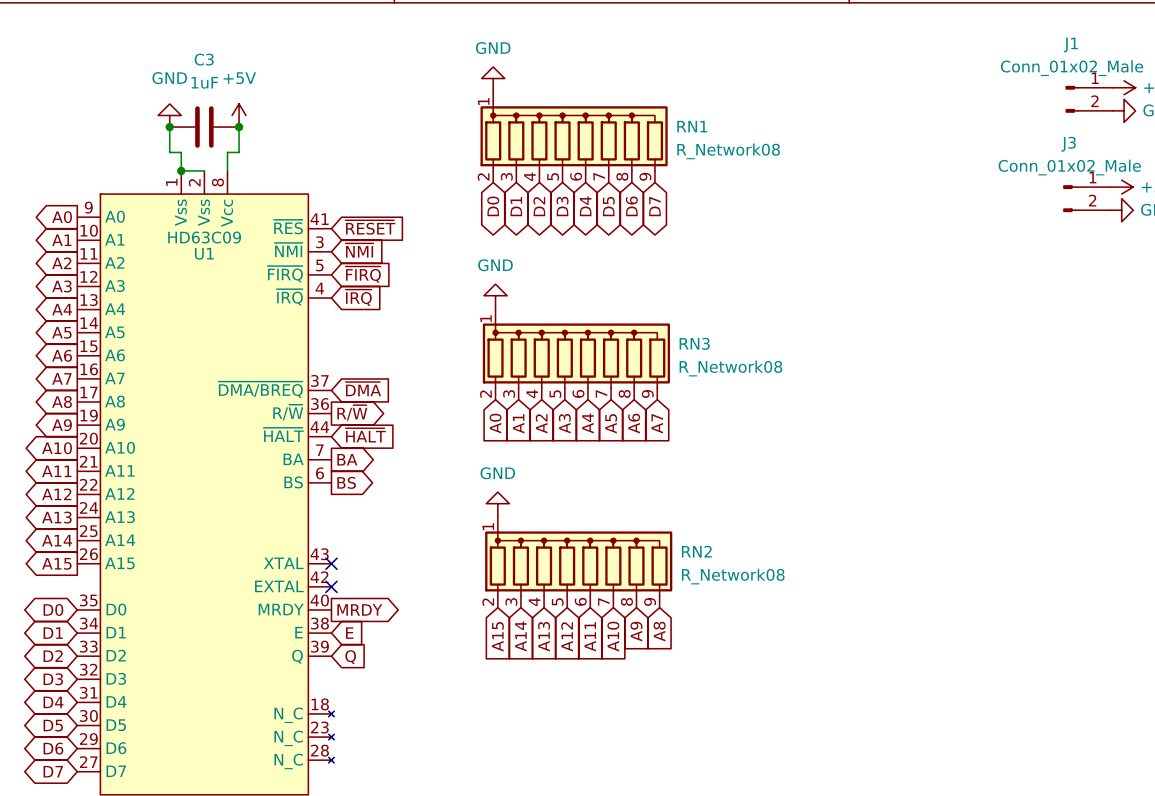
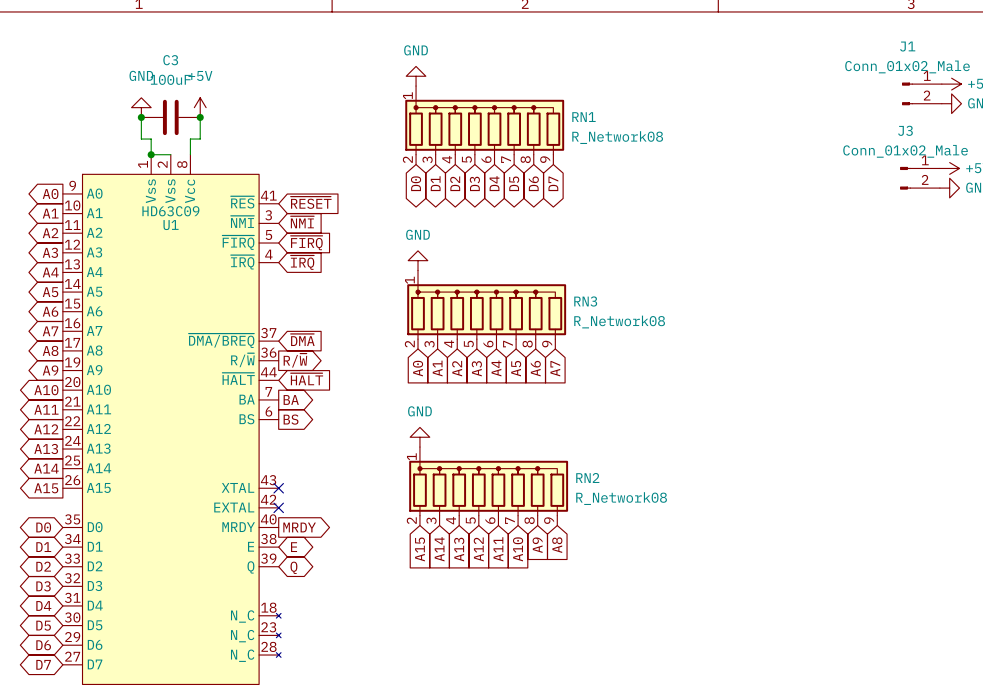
C3 value: 1uF (204, 82) -> 100uF (170, 79)
global label shape: input (349, 633) -> bidirectional (294, 547)
global label shape: input (350, 657) -> bidirectional (293, 567)

